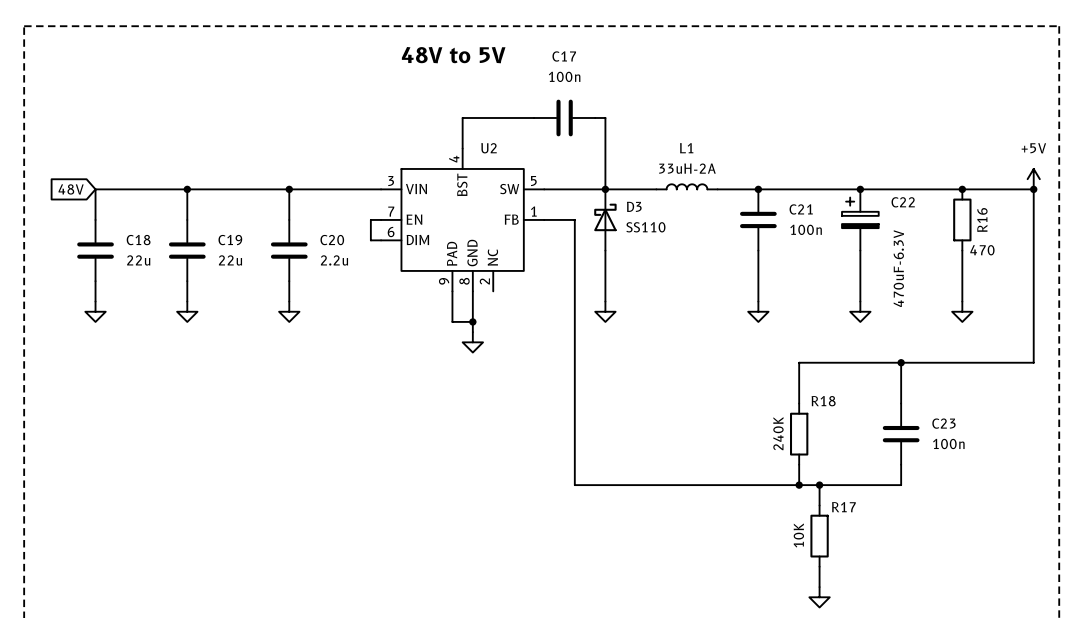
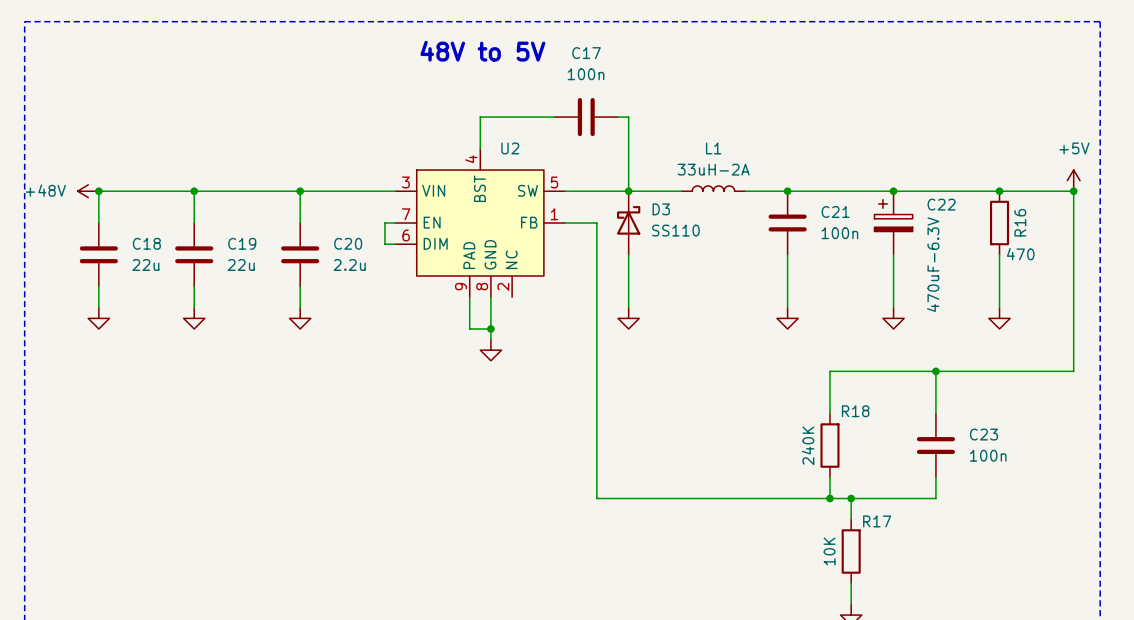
global label: 48V (71, 189) -> none
power symbol: none -> +48V (88, 191)
junction: none -> (98, 191)

